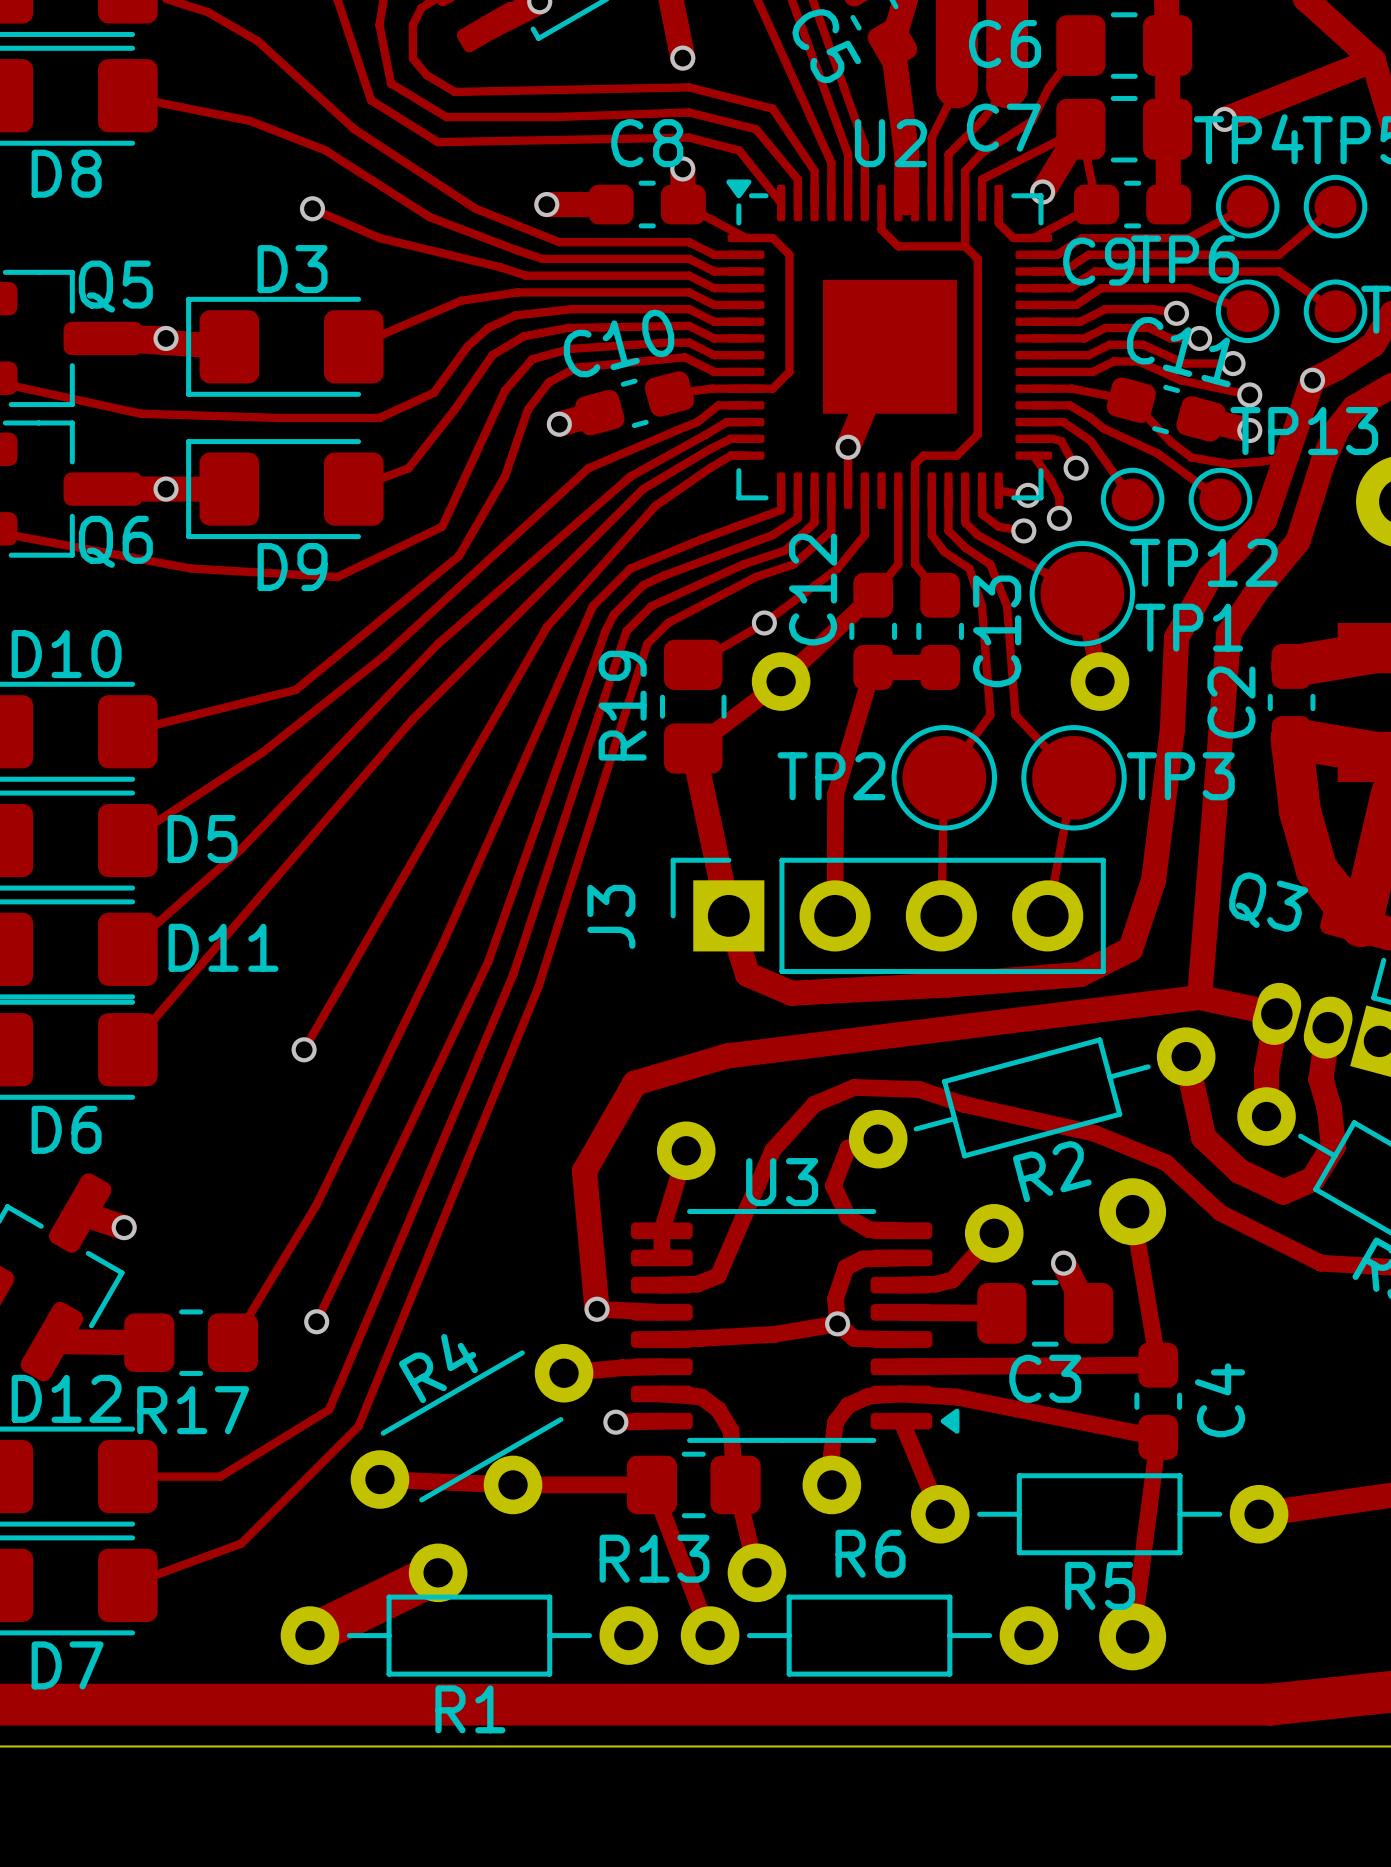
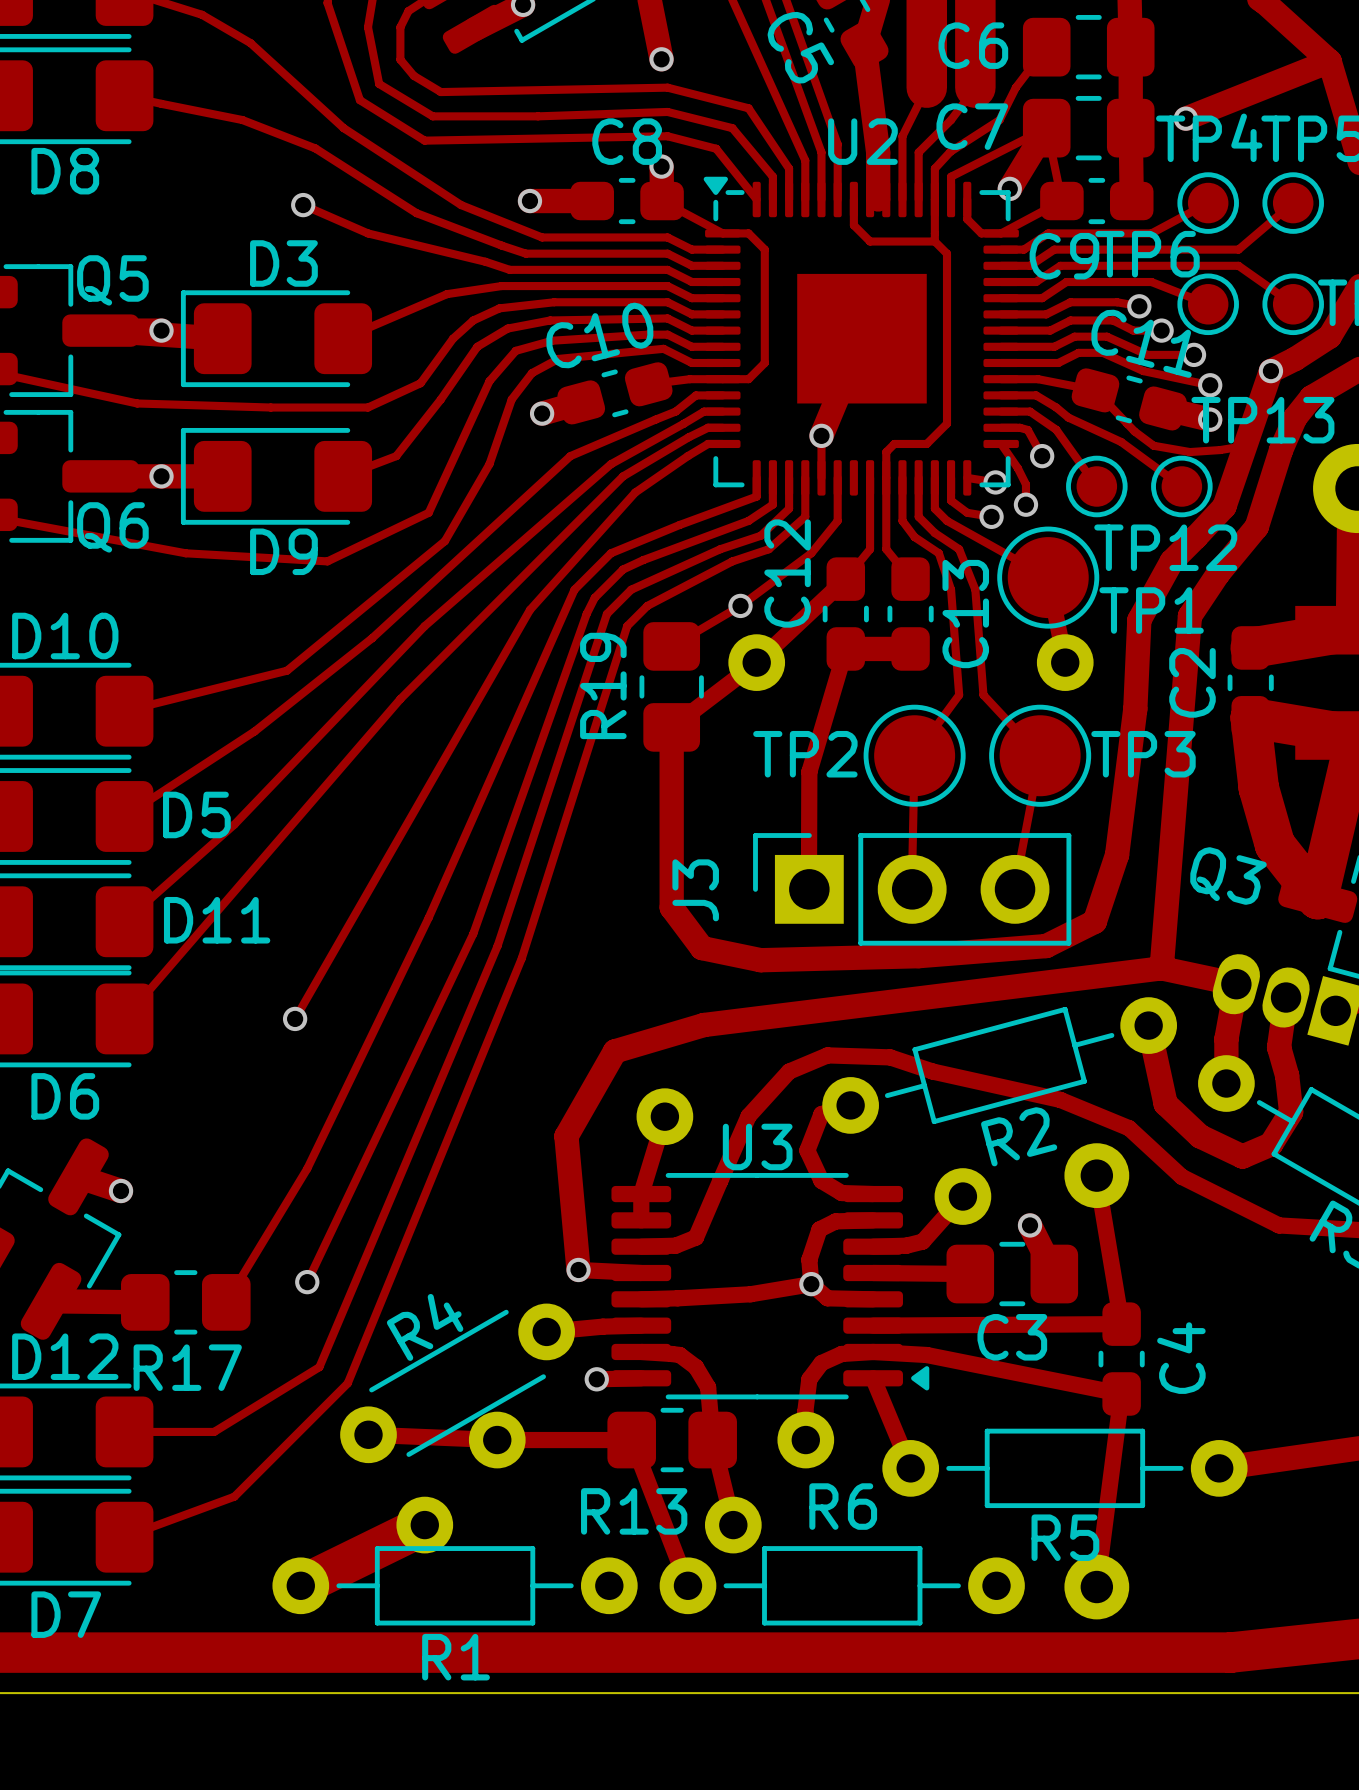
track: (693, 748) (728, 915) (747, 974) (791, 993) (948, 984) -> (671, 727) (671, 907) (702, 948) (760, 960) (918, 956)
J3 footprint: [670, 857, 1106, 975] -> [753, 833, 1072, 946]

